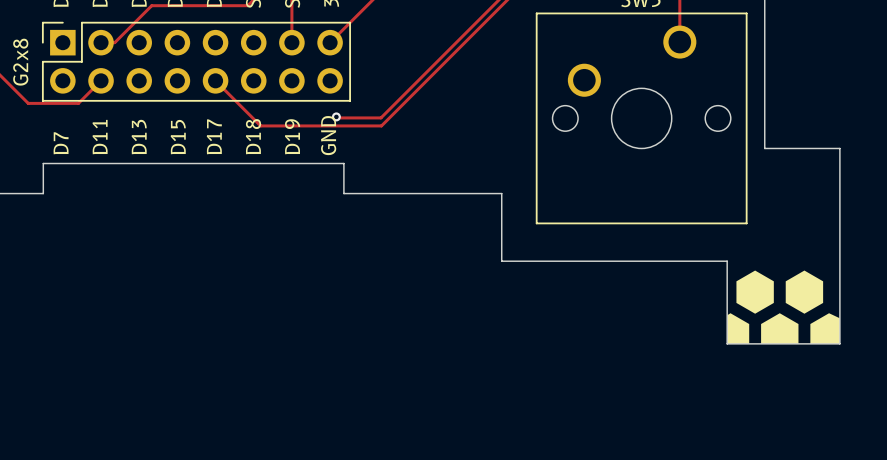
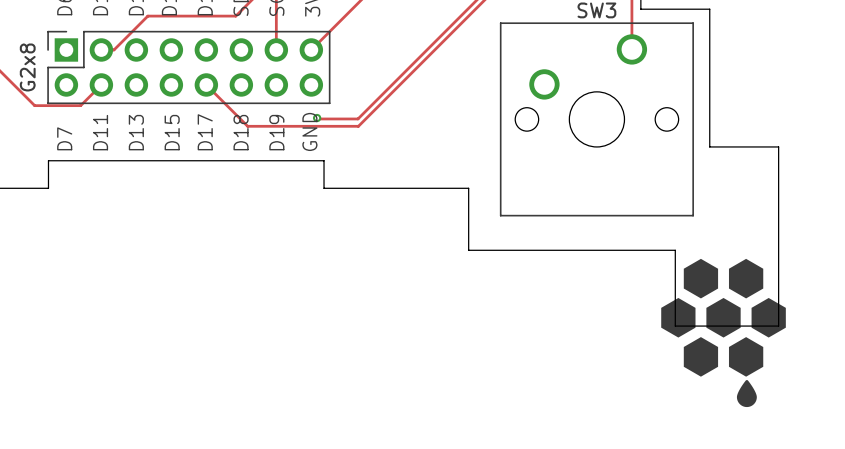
drawing shape: [727, 313, 750, 344] -> [661, 297, 696, 338]
drawing shape: [761, 313, 799, 344] -> [706, 297, 741, 338]
drawing shape: [810, 313, 840, 344] -> [751, 297, 786, 338]
drawing: none -> [683, 337, 764, 408]

